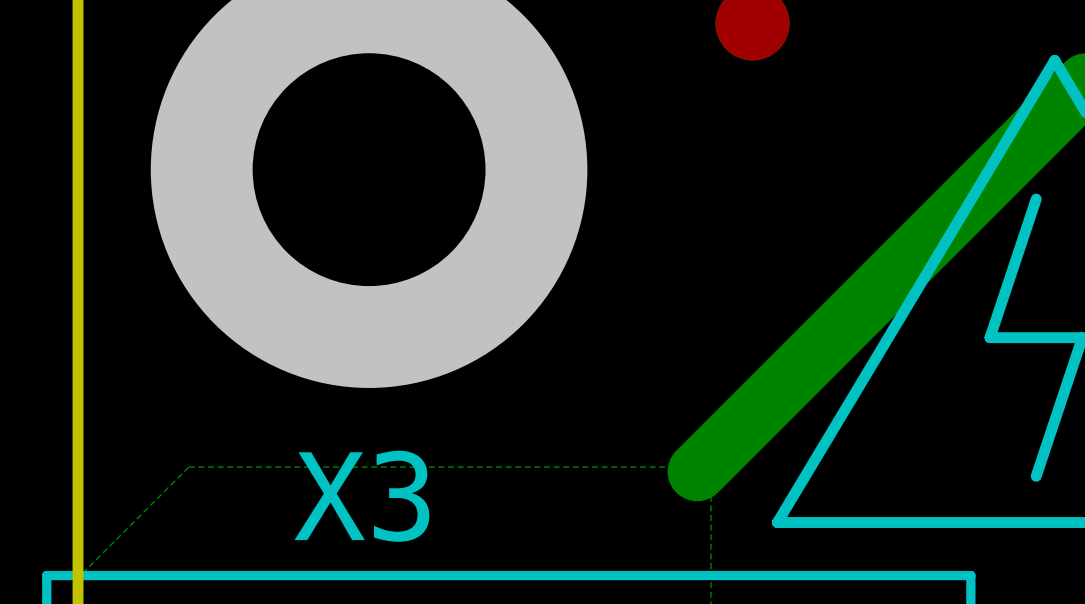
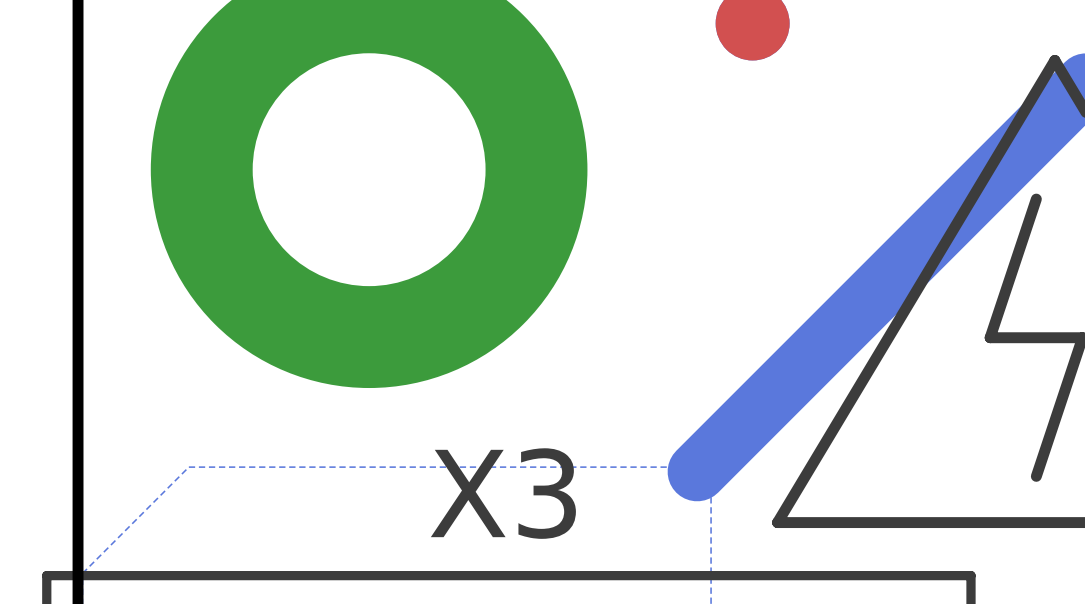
X3 name position: X3 (361, 496) -> X3 (503, 493)

